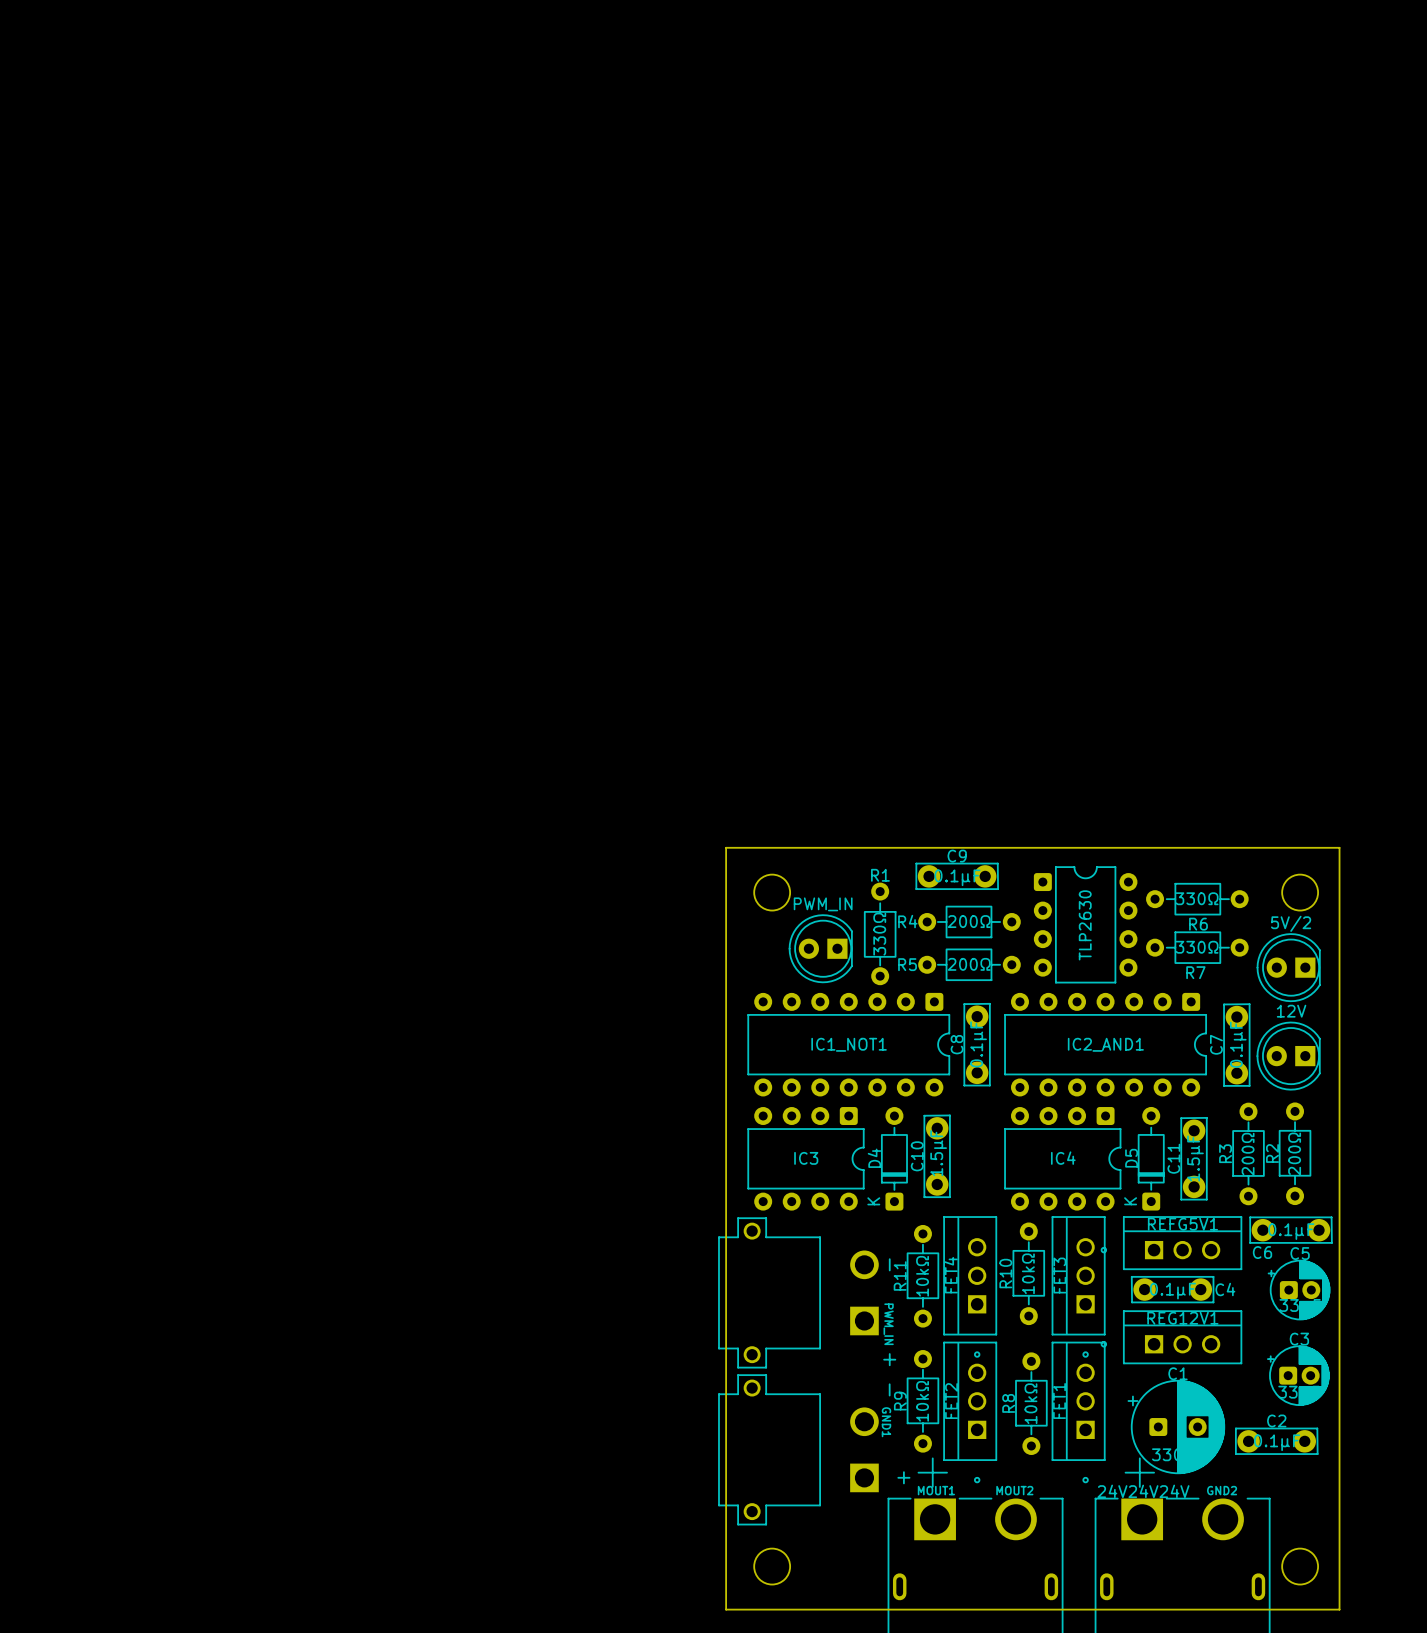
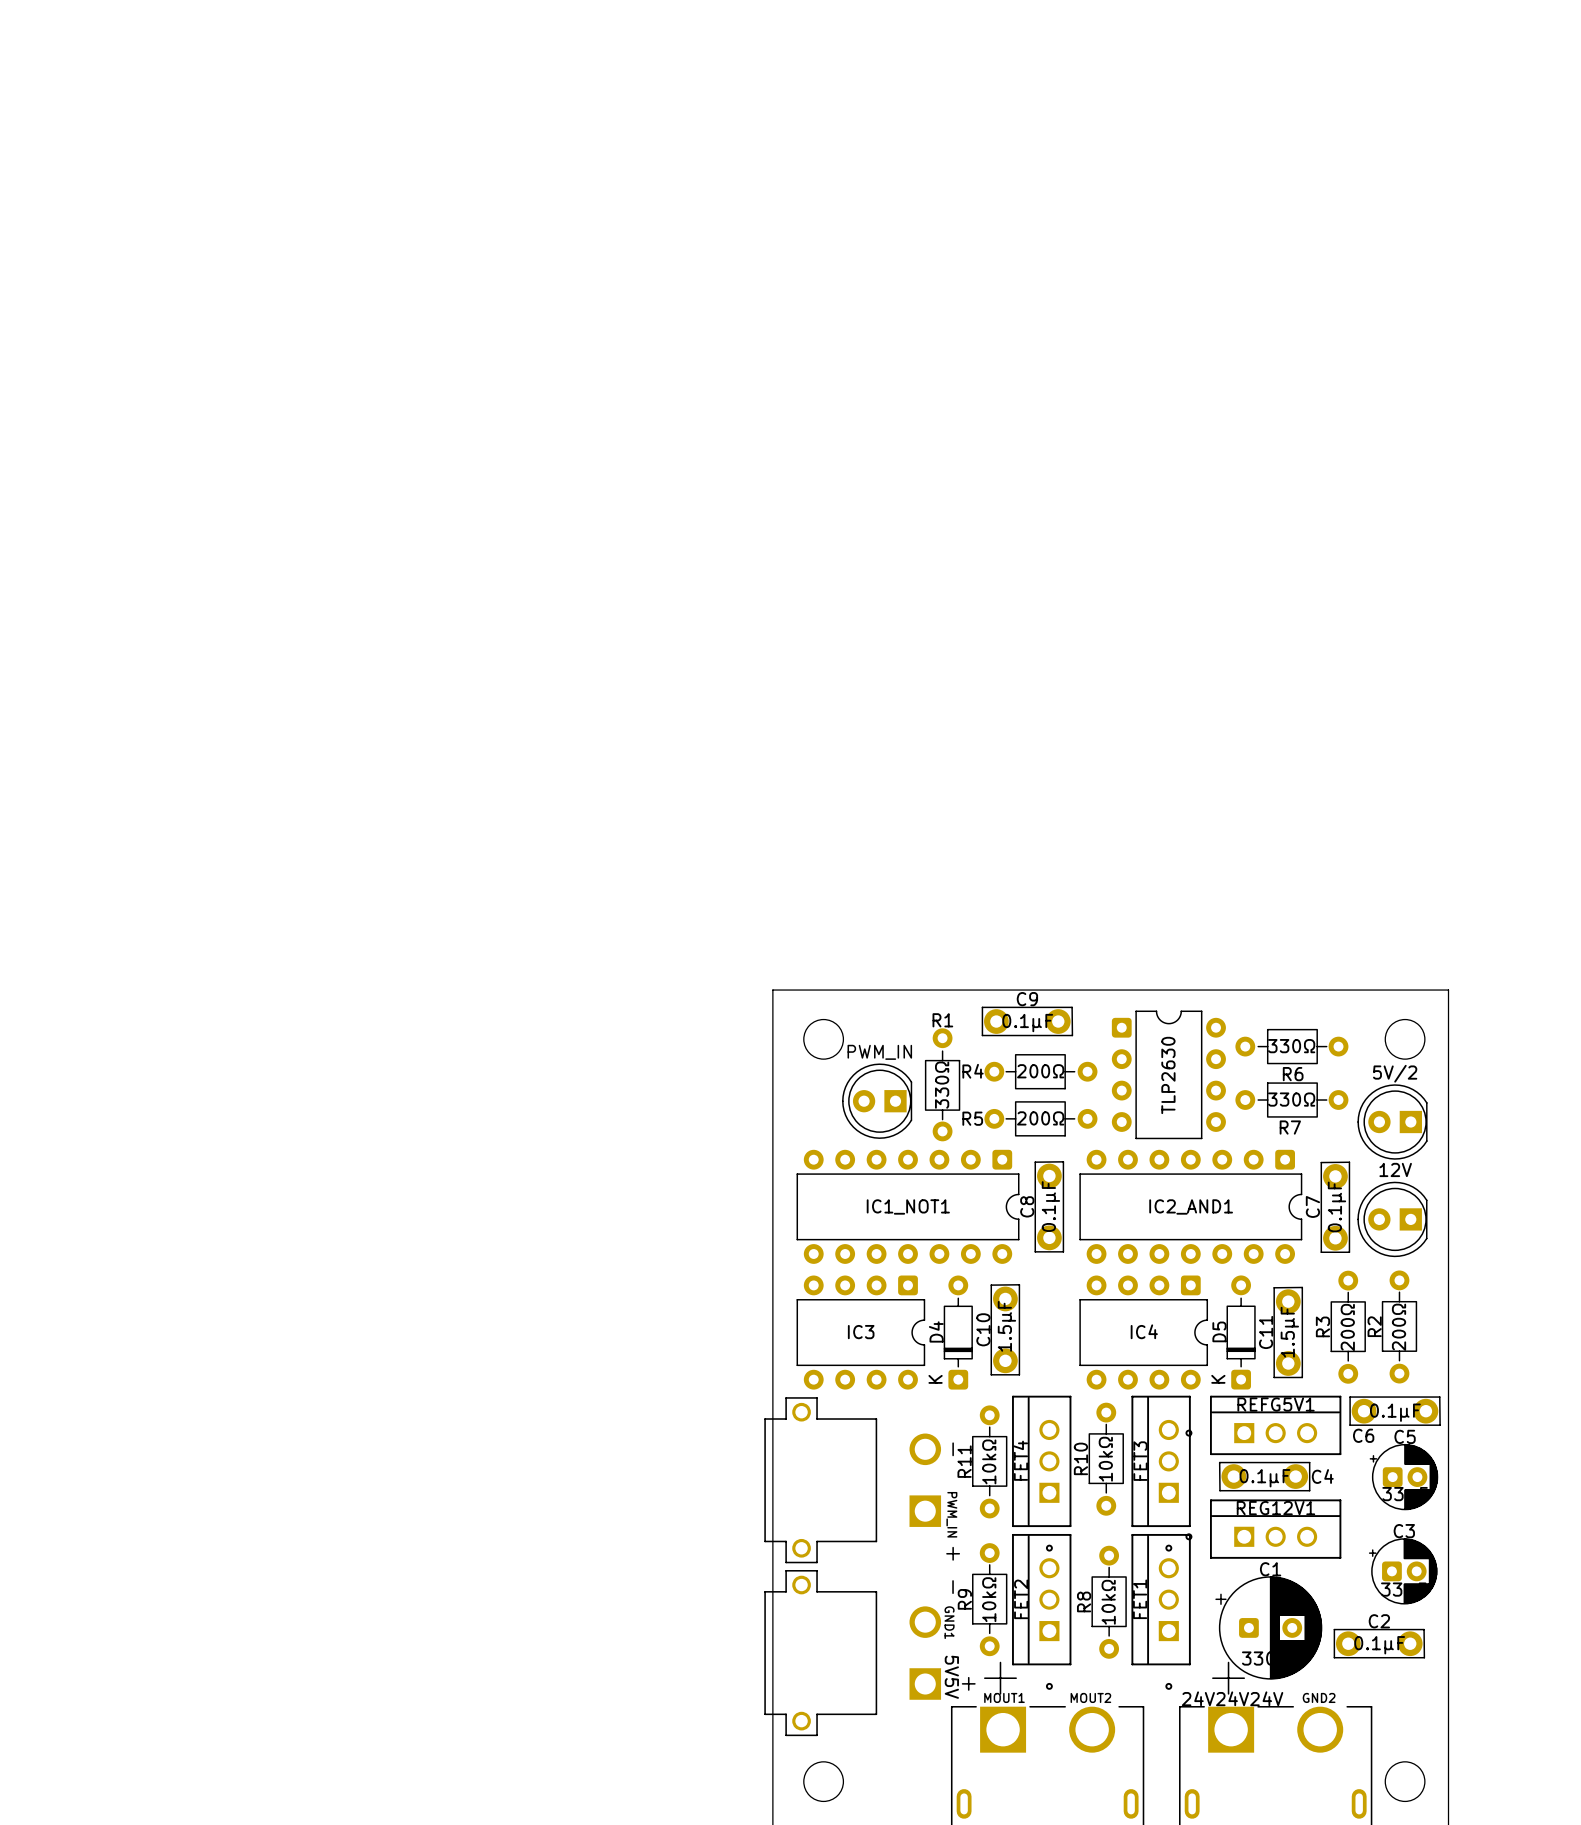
text: none -> 5V5V (951, 1677)

